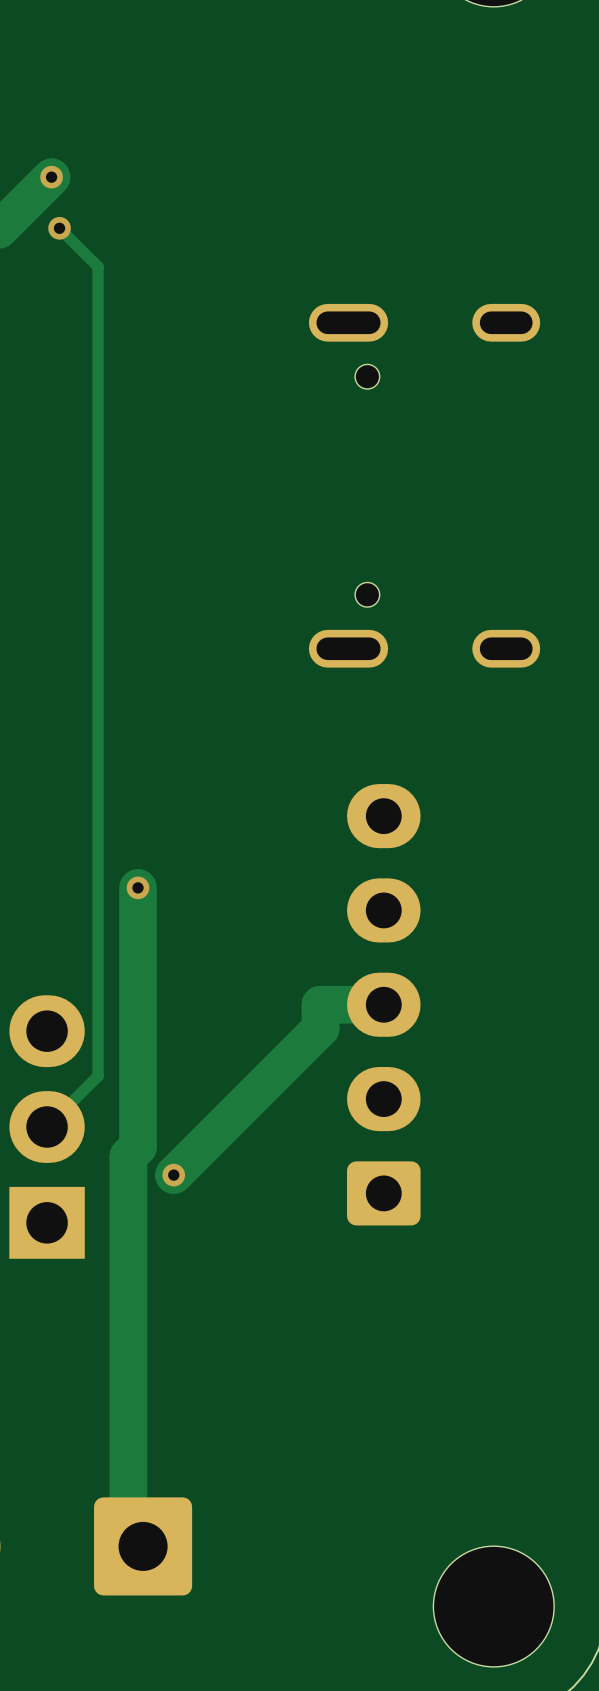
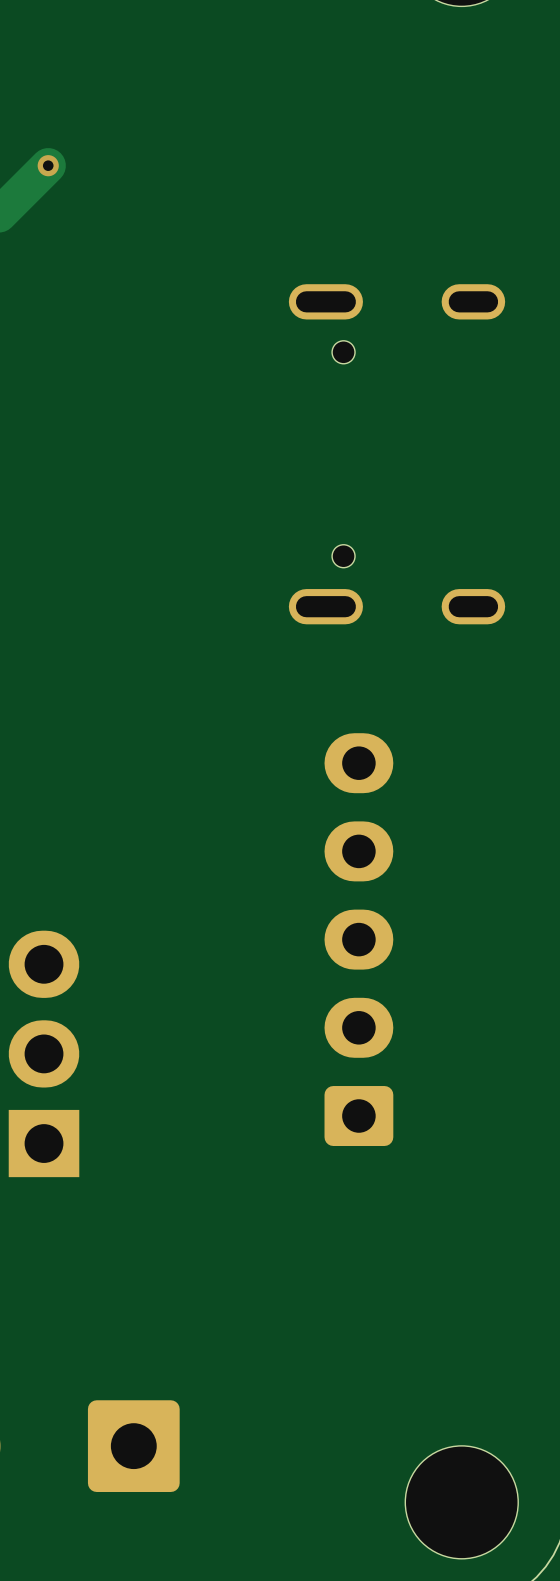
track: (59, 228) (98, 266) (98, 1076) (47, 1127) -> none
via: (59, 228) -> none
track: (138, 887) (138, 1146) (128, 1156) (128, 1531) (143, 1546) -> none
via: (138, 887) -> none
track: (383, 1004) (320, 1004) (320, 1028) (173, 1175) -> none
via: (173, 1175) -> none

